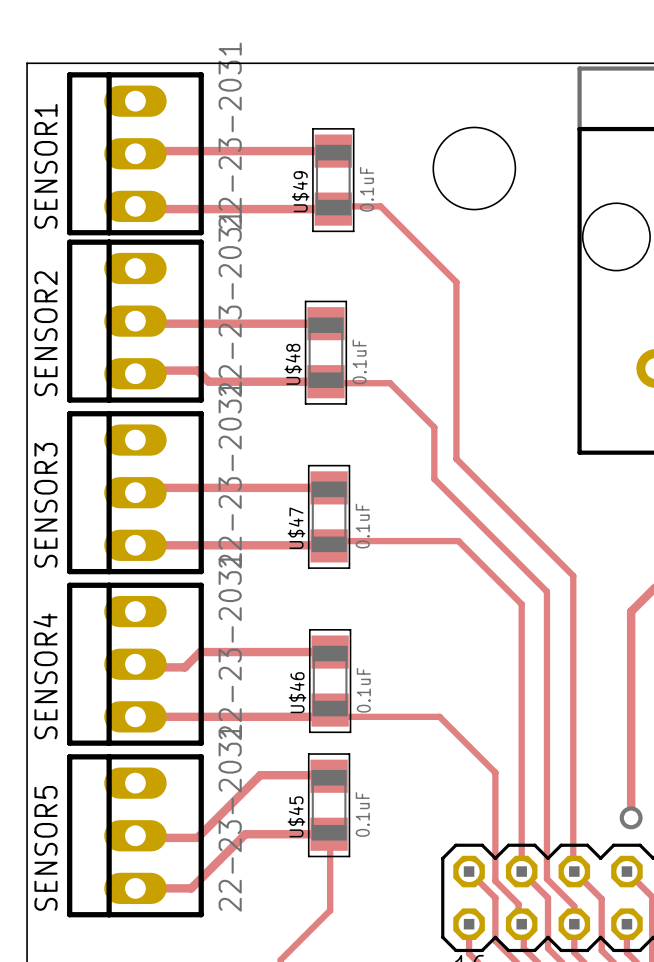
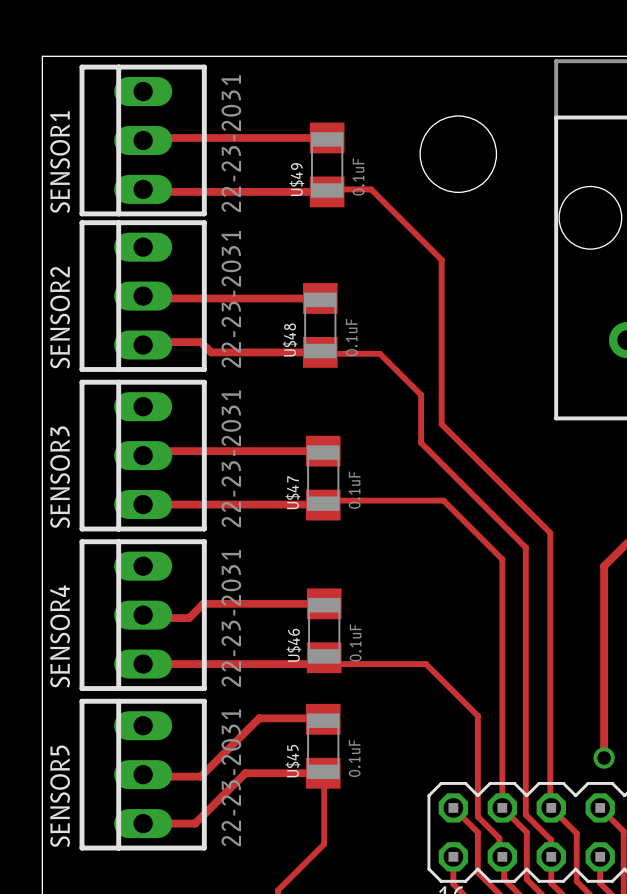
U$49 footprint: [312, 128, 355, 232] -> [309, 122, 345, 208]
U$48 footprint: [305, 300, 347, 405] -> [302, 283, 338, 368]
U$47 footprint: [308, 465, 350, 569] -> [305, 435, 341, 521]
U$46 footprint: [309, 629, 352, 733] -> [306, 588, 342, 674]
U$45 footprint: [308, 753, 350, 858] -> [305, 703, 341, 789]

